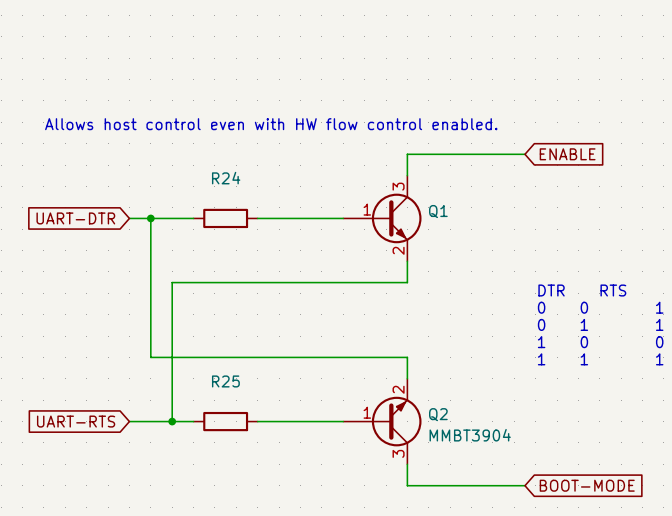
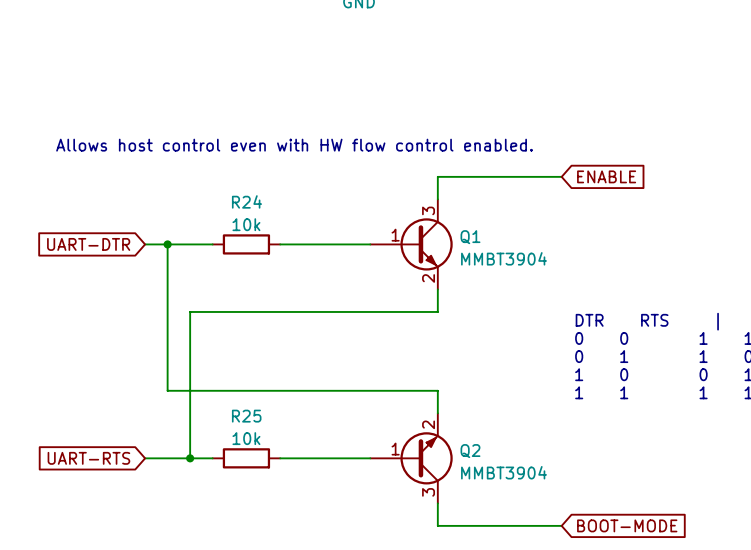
R24 value: none -> 10k (246, 224)
Q1 value: none -> MMBT3904 (503, 258)
R25 value: none -> 10k (246, 438)

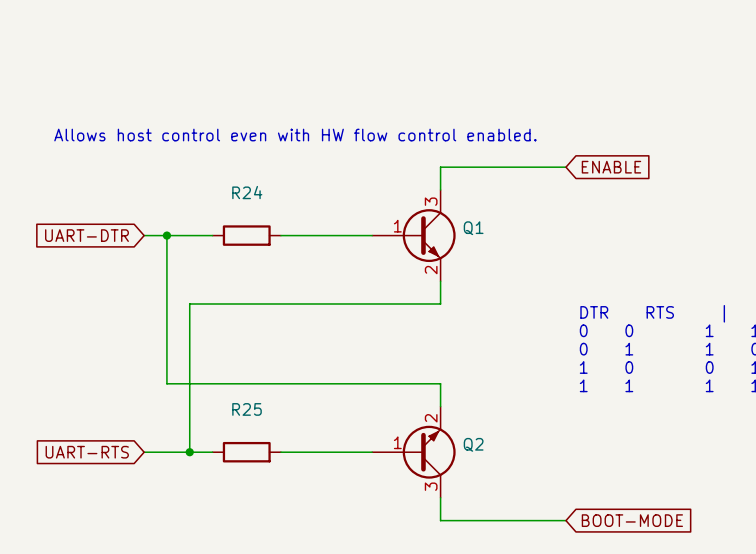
R24 value: 10k (246, 224) -> none
Q1 value: MMBT3904 (503, 258) -> none
R25 value: 10k (246, 438) -> none
Q2 value: MMBT3904 (503, 472) -> none

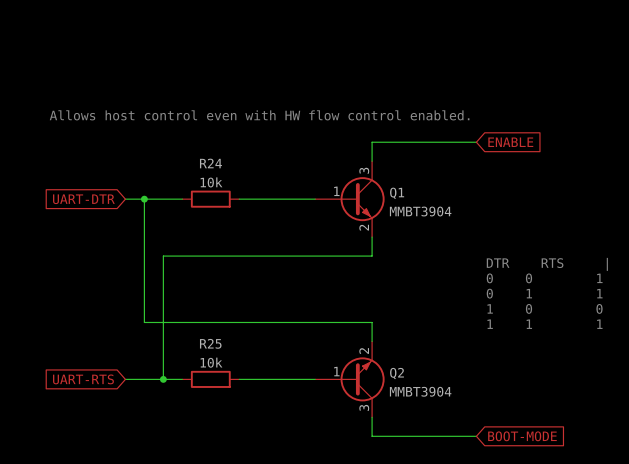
R24 value: none -> 10k (211, 182)
Q1 value: none -> MMBT3904 (420, 211)
R25 value: none -> 10k (211, 362)
Q2 value: none -> MMBT3904 (420, 391)

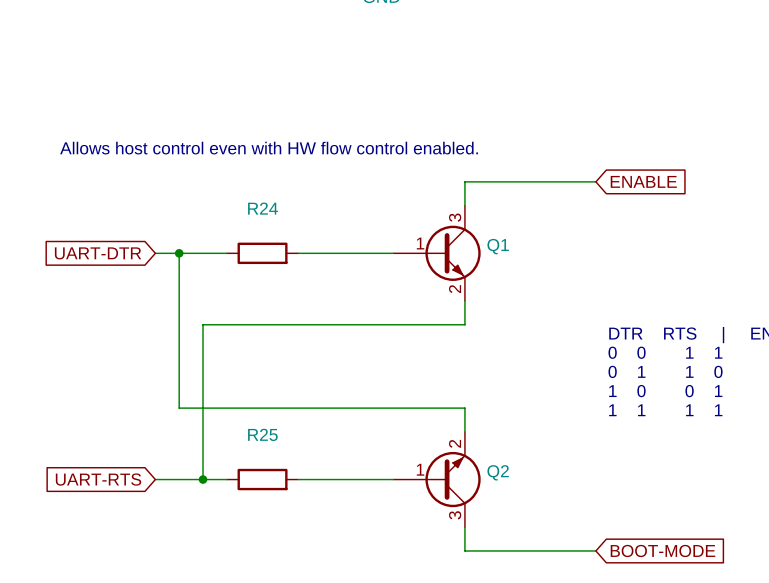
R24 value: 10k (211, 182) -> none
Q1 value: MMBT3904 (420, 211) -> none
R25 value: 10k (211, 362) -> none
Q2 value: MMBT3904 (420, 391) -> none

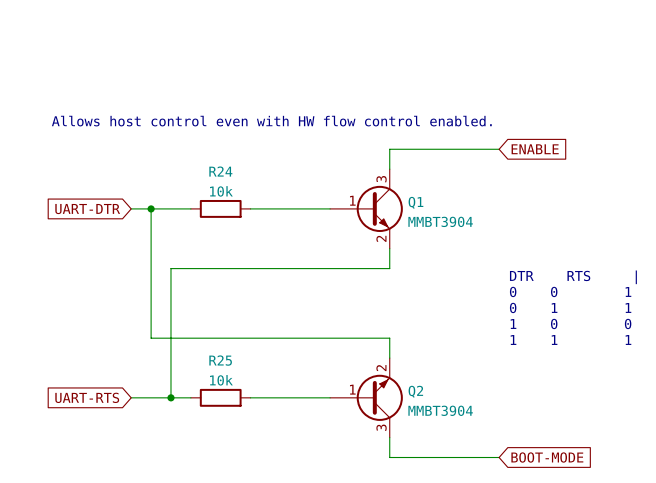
R24 value: none -> 10k (221, 191)
Q1 value: none -> MMBT3904 (440, 221)
R25 value: none -> 10k (221, 380)
Q2 value: none -> MMBT3904 (440, 410)

